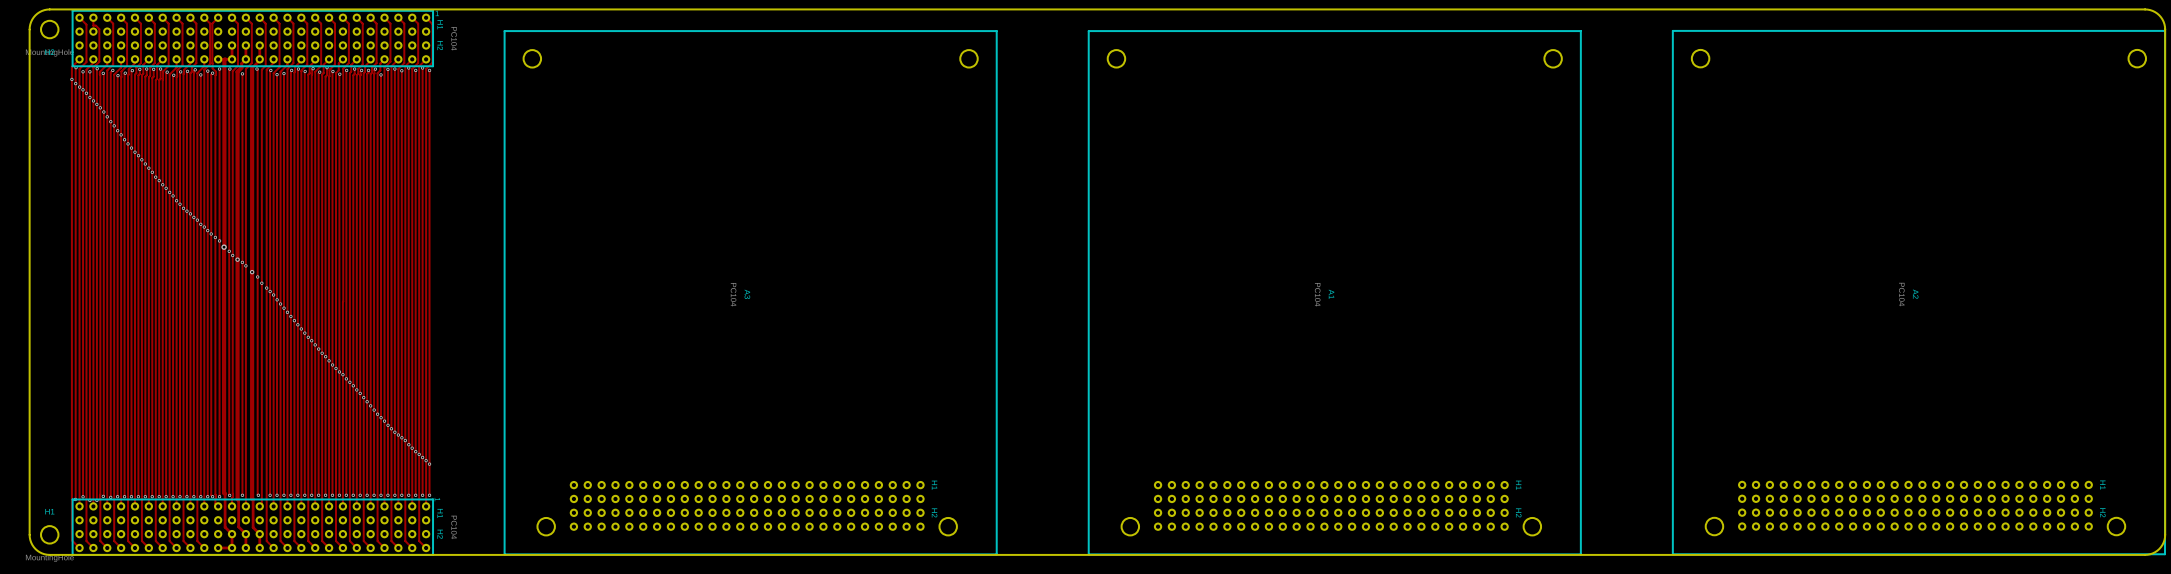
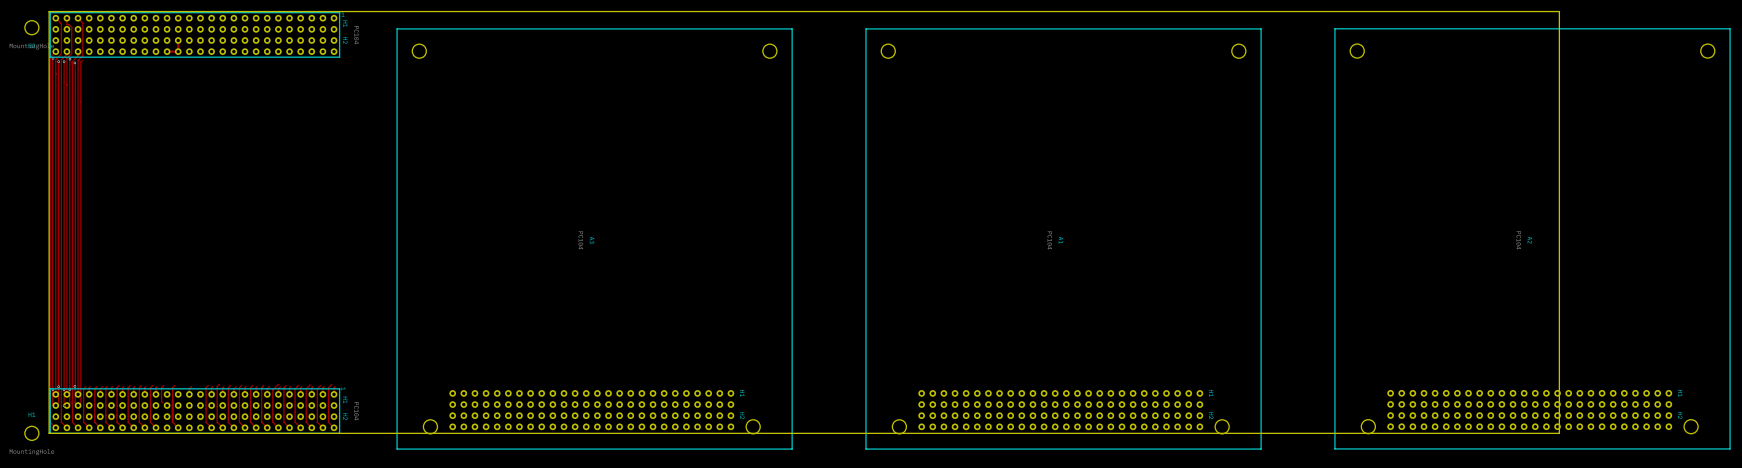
board edge: (71, 9) (42, 10) (32, 19) (29, 29) (29, 534) (33, 547) (44, 554) (2145, 554) (2152, 553) (2162, 544) (2165, 534) (2165, 29) (2163, 21) (2157, 13) (2145, 9) (1952, 9) -> (49, 11) (49, 433) (1559, 433) (1559, 11)
track: (121, 17) (127, 23) (127, 65) (121, 71) (121, 77) (121, 477) -> (90, 386) (89, 387)
track: (134, 17) (140, 23) (140, 63) (136, 67) (134, 74) (134, 479) -> (102, 386) (100, 388)
track: (148, 17) (154, 23) (154, 63) (150, 67) (148, 77) (148, 477) -> (112, 386) (111, 387)
track: (162, 17) (168, 23) (168, 65) (163, 71) (162, 80) (162, 477) -> (123, 386) (122, 387)
track: (176, 17) (182, 23) (182, 65) (177, 70) (176, 77) (176, 477) -> (134, 386) (133, 387)
track: (190, 17) (196, 23) (196, 63) (191, 67) (190, 73) (190, 477) -> (145, 386) (144, 387)
track: (204, 17) (210, 23) (210, 63) (204, 69) (204, 477) -> (157, 386) (155, 387)
track: (218, 17) (212, 23) (212, 68) (216, 71) (215, 503) (218, 506) -> none
track: (232, 17) (237, 23) (237, 65) (232, 71) (232, 255) -> none
track: (245, 17) (251, 23) (251, 63) (245, 69) (245, 479) -> (191, 386) (189, 388)
track: (259, 17) (265, 23) (265, 65) (261, 69) (261, 504) (259, 506) -> none
track: (273, 17) (279, 23) (279, 67) (273, 73) (273, 477) -> (212, 386) (211, 387)
track: (287, 17) (293, 23) (293, 63) (287, 69) (287, 477) -> (223, 386) (222, 387)
track: (301, 17) (307, 23) (307, 64) (301, 71) (301, 479) -> (236, 386) (233, 388)
track: (315, 17) (321, 23) (321, 65) (315, 71) (315, 477) -> (246, 386) (245, 387)
track: (329, 17) (335, 23) (335, 64) (330, 69) -> none
track: (342, 17) (348, 23) (348, 63) (343, 68) (342, 479) -> (269, 386) (267, 388)
track: (356, 17) (362, 23) (362, 64) (358, 69) (356, 75) (356, 479) -> (280, 386) (278, 388)
track: (370, 17) (376, 23) (376, 63) (371, 67) (370, 73) (370, 477) -> (290, 386) (289, 387)
track: (384, 17) (390, 23) (390, 61) (385, 66) -> none
track: (398, 17) (404, 23) (404, 63) (398, 69) (398, 477) -> (312, 386) (311, 387)
track: (412, 17) (418, 23) (418, 63) (412, 69) (412, 477) -> (324, 386) (322, 387)
track: (426, 17) (432, 23) (432, 62) (426, 69) (426, 477) -> (335, 386) (334, 387)
track: (245, 45) (245, 59) (237, 71) (237, 499) (238, 526) (245, 534) (245, 547) -> none
track: (259, 45) (259, 60) (252, 68) (252, 498) (253, 527) (259, 534) (259, 547) -> none
track: (121, 59) (121, 67) (114, 74) (114, 479) -> (85, 386) (83, 388)
track: (134, 59) (134, 63) (128, 69) (128, 75) (128, 479) -> (96, 386) (94, 388)
track: (148, 59) (143, 64) (141, 75) (141, 477) -> (107, 386) (105, 387)
track: (162, 59) (157, 64) (155, 80) (155, 477) -> (119, 385) (117, 387)
track: (176, 59) (176, 67) (169, 74) (169, 477) -> (130, 385) (128, 387)
track: (190, 59) (190, 63) (184, 69) (183, 73) (183, 477) -> (141, 385) (139, 387)
track: (204, 59) (204, 66) (197, 73) (197, 477) -> (152, 385) (150, 387)
track: (225, 59) (225, 493) -> (174, 385) (172, 387) (172, 400)
track: (273, 59) (273, 62) (266, 69) (266, 477) -> (208, 385) (206, 387)
track: (287, 59) (287, 64) (280, 71) (280, 476) -> (219, 384) (217, 386)
track: (301, 59) (295, 67) (294, 72) (294, 477) -> (230, 385) (228, 387)
track: (315, 59) (309, 66) (308, 74) (308, 477) -> (241, 385) (239, 387)
track: (329, 59) (323, 64) (322, 74) (322, 477) -> (252, 385) (250, 387)
track: (342, 59) (338, 63) (338, 70) (336, 73) (336, 477) -> (263, 385) (261, 387)
track: (356, 59) (351, 64) (349, 73) (349, 480) -> (278, 384) (272, 389)
track: (370, 59) (365, 66) (363, 73) (363, 477) -> (286, 385) (283, 387)
track: (384, 59) (380, 63) (380, 70) (377, 73) (377, 479) -> (298, 385) (295, 388)
track: (398, 59) (391, 66) (391, 479) -> (310, 384) (306, 388)
track: (412, 59) (405, 66) (405, 479) -> (320, 385) (317, 388)
track: (426, 59) (419, 66) (419, 477) -> (331, 384) (328, 387)
track: (72, 66) (71, 540) (79, 547) -> (50, 57) (50, 422) (55, 427)
track: (385, 66) (384, 477) -> (301, 386) (300, 387)
track: (327, 67) (325, 495) -> none
via: (327, 67) -> none
track: (408, 67) (408, 495) -> none
via: (408, 67) -> none
track: (422, 67) (422, 495) -> none
via: (422, 67) -> none
track: (313, 68) (311, 495) -> none
via: (313, 68) -> none
track: (139, 69) (138, 496) -> none
via: (139, 69) -> none
track: (146, 69) (145, 496) -> none
via: (146, 69) -> none
track: (153, 69) (152, 496) -> none
via: (153, 69) -> none
track: (160, 69) (159, 496) -> none
via: (160, 69) -> none
track: (195, 69) (193, 496) -> none
via: (195, 69) -> none
track: (219, 69) (219, 496) -> none
via: (219, 69) -> none
track: (229, 69) (229, 495) -> none
via: (229, 69) -> none
track: (256, 69) (258, 495) -> none
via: (256, 69) -> none
track: (298, 69) (297, 324) -> none
via: (298, 69) -> none
track: (330, 69) (329, 477) -> (257, 386) (256, 387)
track: (354, 69) (353, 385) -> none
via: (354, 69) -> none
track: (375, 69) (374, 495) -> none
via: (375, 69) -> none
track: (387, 69) (387, 495) -> none
via: (387, 69) -> none
track: (394, 69) (394, 495) -> none
via: (394, 69) -> none
via: (112, 70) -> none
track: (132, 70) (131, 148) -> none
via: (132, 70) -> none
track: (270, 70) (270, 291) -> none
via: (270, 70) -> none
track: (291, 70) (290, 495) -> none
via: (291, 70) -> none
track: (346, 70) (346, 378) -> none
via: (346, 70) -> none
track: (361, 70) (360, 495) -> none
via: (361, 70) -> none
track: (368, 70) (367, 495) -> none
via: (368, 70) -> none
track: (401, 70) (401, 495) -> none
via: (401, 70) -> none
track: (415, 70) (415, 451) -> none
via: (415, 70) -> none
track: (429, 70) (429, 495) -> none
via: (429, 70) -> none
track: (180, 71) (179, 496) -> none
via: (180, 71) -> none
track: (187, 71) (186, 496) -> none
via: (187, 71) -> none
track: (207, 71) (207, 496) -> none
via: (207, 71) -> none
track: (305, 71) (304, 333) -> none
via: (305, 71) -> none
track: (332, 71) (332, 495) -> none
via: (332, 71) -> none
track: (167, 72) (166, 496) -> none
via: (167, 72) -> none
track: (319, 72) (318, 495) -> none
via: (319, 72) -> none
track: (125, 73) (124, 496) -> none
via: (125, 73) -> none
track: (212, 73) (211, 477) -> (163, 385) (161, 387)
via: (212, 73) -> none
track: (242, 73) (242, 262) -> none
via: (242, 73) -> none
track: (283, 73) (283, 308) -> none
via: (283, 73) -> none
track: (200, 74) (200, 496) -> none
via: (200, 74) -> none
track: (277, 74) (277, 495) -> none
via: (277, 74) -> none
track: (339, 74) (339, 371) -> none
via: (339, 74) -> none
track: (381, 74) (381, 495) -> none
via: (381, 74) -> none
track: (118, 75) (117, 130) -> none
via: (118, 75) -> none
track: (173, 75) (173, 496) -> none
via: (173, 75) -> none
via: (71, 79) -> none
via: (75, 83) -> none
via: (79, 87) -> none
via: (82, 89) -> none
via: (86, 93) -> none
via: (89, 97) -> none
via: (93, 100) -> none
via: (96, 104) -> none
via: (100, 107) -> none
via: (103, 112) -> none
via: (107, 116) -> none
via: (110, 121) -> none
via: (114, 125) -> none
track: (117, 130) (117, 496) -> none
via: (117, 130) -> none
via: (121, 134) -> none
via: (124, 139) -> none
via: (128, 143) -> none
track: (131, 148) (131, 496) -> none
via: (131, 148) -> none
via: (134, 152) -> none
via: (138, 155) -> none
via: (141, 159) -> none
via: (145, 163) -> none
via: (148, 168) -> none
via: (152, 172) -> none
via: (155, 177) -> none
via: (159, 180) -> none
via: (162, 184) -> none
via: (166, 188) -> none
via: (169, 192) -> none
via: (173, 195) -> none
via: (176, 200) -> none
via: (179, 204) -> none
via: (183, 208) -> none
via: (186, 211) -> none
via: (190, 213) -> none
via: (193, 217) -> none
via: (197, 220) -> none
via: (200, 224) -> none
via: (204, 227) -> none
via: (207, 230) -> none
via: (211, 234) -> none
via: (215, 237) -> none
via: (219, 240) -> none
via: (224, 247) -> none
via: (229, 251) -> none
track: (232, 255) (232, 506) -> none
via: (232, 255) -> none
via: (237, 259) -> none
track: (242, 262) (242, 495) -> none
via: (242, 262) -> none
via: (245, 265) -> none
via: (252, 272) -> none
via: (257, 276) -> none
via: (261, 283) -> none
via: (266, 288) -> none
track: (270, 291) (270, 495) -> none
via: (270, 291) -> none
via: (273, 294) -> none
via: (277, 299) -> none
via: (280, 304) -> none
track: (283, 308) (283, 495) -> none
via: (284, 308) -> none
via: (287, 312) -> none
via: (290, 316) -> none
via: (294, 320) -> none
track: (297, 324) (297, 495) -> none
via: (297, 324) -> none
via: (301, 328) -> none
track: (304, 333) (304, 495) -> none
via: (304, 333) -> none
via: (308, 337) -> none
via: (311, 340) -> none
via: (315, 344) -> none
via: (318, 349) -> none
via: (322, 353) -> none
via: (325, 356) -> none
via: (329, 360) -> none
via: (332, 365) -> none
via: (336, 368) -> none
track: (339, 371) (339, 495) -> none
via: (339, 371) -> none
via: (342, 374) -> none
track: (346, 378) (346, 495) -> none
via: (346, 378) -> none
via: (349, 382) -> none
track: (353, 385) (353, 495) -> none
via: (353, 385) -> none
via: (356, 389) -> none
via: (360, 393) -> none
via: (363, 397) -> none
via: (367, 401) -> none
via: (370, 405) -> none
via: (374, 410) -> none
via: (377, 414) -> none
via: (381, 417) -> none
via: (384, 421) -> none
via: (388, 425) -> none
via: (391, 428) -> none
via: (394, 432) -> none
via: (398, 435) -> none
via: (401, 437) -> none
via: (405, 440) -> none
via: (408, 444) -> none
via: (412, 448) -> none
track: (415, 451) (415, 495) -> none
via: (415, 451) -> none
via: (419, 454) -> none
via: (422, 457) -> none
via: (426, 460) -> none
via: (429, 464) -> none
via: none -> (58, 386)
via: none -> (74, 386)
via: none -> (52, 389)
via: none -> (64, 389)
via: none -> (69, 389)
track: (79, 486) (79, 506) -> none
track: (93, 486) (93, 506) -> none
track: (107, 486) (107, 506) -> none
track: (121, 486) (121, 506) -> none
track: (134, 486) (134, 506) -> none
track: (148, 486) (148, 506) -> none
track: (162, 486) (162, 506) -> none
track: (176, 486) (176, 506) -> none
track: (190, 486) (190, 506) -> none
track: (204, 486) (204, 506) -> none
track: (245, 486) (245, 506) -> none
track: (273, 486) (273, 506) -> none
track: (287, 486) (287, 506) -> none
track: (301, 486) (301, 506) -> none
track: (315, 486) (315, 506) -> none
track: (329, 486) (329, 506) -> none
track: (342, 486) (342, 506) -> none
track: (356, 486) (356, 506) -> none
track: (370, 486) (370, 506) -> none
track: (384, 486) (384, 506) -> none
track: (398, 486) (398, 506) -> none
track: (412, 486) (412, 506) -> none
track: (426, 486) (426, 506) -> none
via: (229, 495) -> none
via: (242, 495) -> none
via: (258, 495) -> none
via: (270, 495) -> none
via: (277, 495) -> none
via: (283, 495) -> none
via: (290, 495) -> none
via: (297, 495) -> none
via: (304, 495) -> none
via: (311, 495) -> none
via: (318, 495) -> none
via: (325, 495) -> none
via: (332, 495) -> none
via: (339, 495) -> none
via: (346, 495) -> none
via: (353, 495) -> none
via: (360, 495) -> none
via: (367, 495) -> none
via: (374, 495) -> none
via: (381, 495) -> none
via: (387, 495) -> none
via: (394, 495) -> none
via: (401, 495) -> none
via: (408, 495) -> none
via: (415, 495) -> none
via: (422, 495) -> none
via: (429, 495) -> none
via: (83, 496) -> none
via: (103, 496) -> none
via: (117, 496) -> none
via: (124, 496) -> none
via: (131, 496) -> none
via: (138, 496) -> none
via: (145, 496) -> none
via: (152, 496) -> none
via: (159, 496) -> none
via: (166, 496) -> none
via: (173, 496) -> none
via: (179, 496) -> none
via: (186, 496) -> none
via: (193, 496) -> none
via: (200, 496) -> none
via: (207, 496) -> none
via: (212, 496) -> none
via: (219, 496) -> none
via: (110, 497) -> none
via: (75, 499) -> none
via: (96, 500) -> none
track: (86, 520) (86, 541) (93, 547) -> (61, 422) (66, 427)
track: (100, 520) (100, 541) (107, 547) -> (72, 422) (78, 427)
track: (114, 520) (114, 541) (121, 547) -> (83, 422) (89, 427)
track: (128, 520) (128, 541) (134, 547) -> (94, 422) (100, 427)
track: (141, 520) (141, 541) (148, 547) -> (105, 422) (111, 427)
track: (155, 520) (155, 541) (162, 547) -> (117, 422) (122, 427)
track: (169, 520) (169, 541) (176, 547) -> (128, 422) (133, 427)
track: (183, 520) (183, 541) (190, 547) -> (139, 422) (144, 427)
track: (197, 520) (197, 541) (204, 547) -> (150, 422) (155, 427)
track: (225, 520) (225, 527) (232, 534) (232, 547) (218, 547) -> (172, 422) (178, 427)
track: (266, 520) (266, 541) (273, 547) -> (206, 422) (211, 427)
track: (280, 520) (280, 541) (287, 547) -> (217, 422) (222, 427)
track: (294, 520) (294, 541) (301, 547) -> (228, 422) (233, 427)
track: (308, 520) (308, 541) (315, 547) -> (239, 422) (245, 427)
track: (322, 520) (322, 541) (329, 547) -> (250, 422) (256, 427)
track: (336, 520) (336, 541) (342, 547) -> (261, 422) (267, 427)
track: (349, 520) (349, 541) (356, 547) -> (272, 422) (278, 427)
track: (363, 520) (363, 541) (370, 547) -> (283, 422) (289, 427)
track: (377, 520) (377, 541) (384, 547) -> (295, 422) (300, 427)
track: (391, 520) (391, 541) (398, 547) -> (306, 422) (311, 427)
track: (405, 520) (405, 541) (412, 547) -> (317, 422) (322, 427)
track: (419, 520) (419, 541) (426, 547) -> (328, 422) (334, 427)
part position: (252, 527) -> (194, 411)

